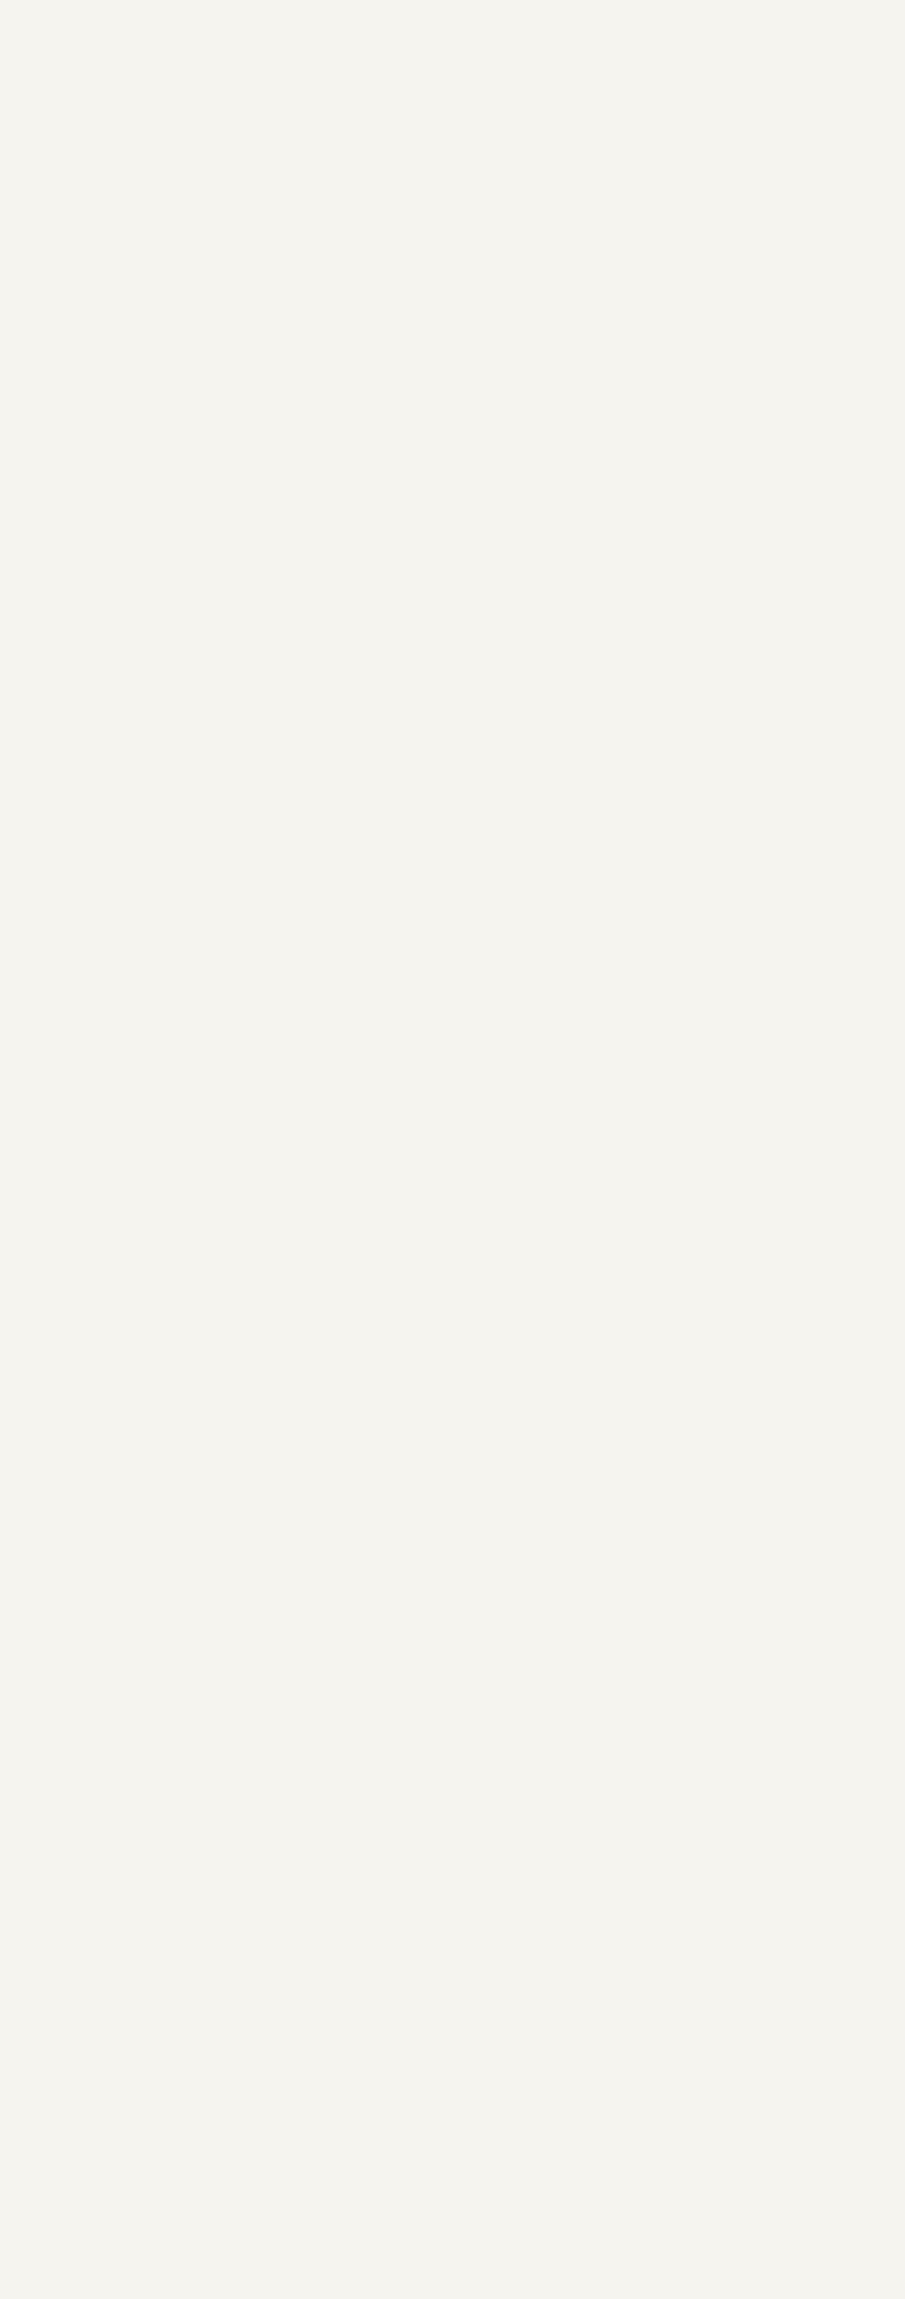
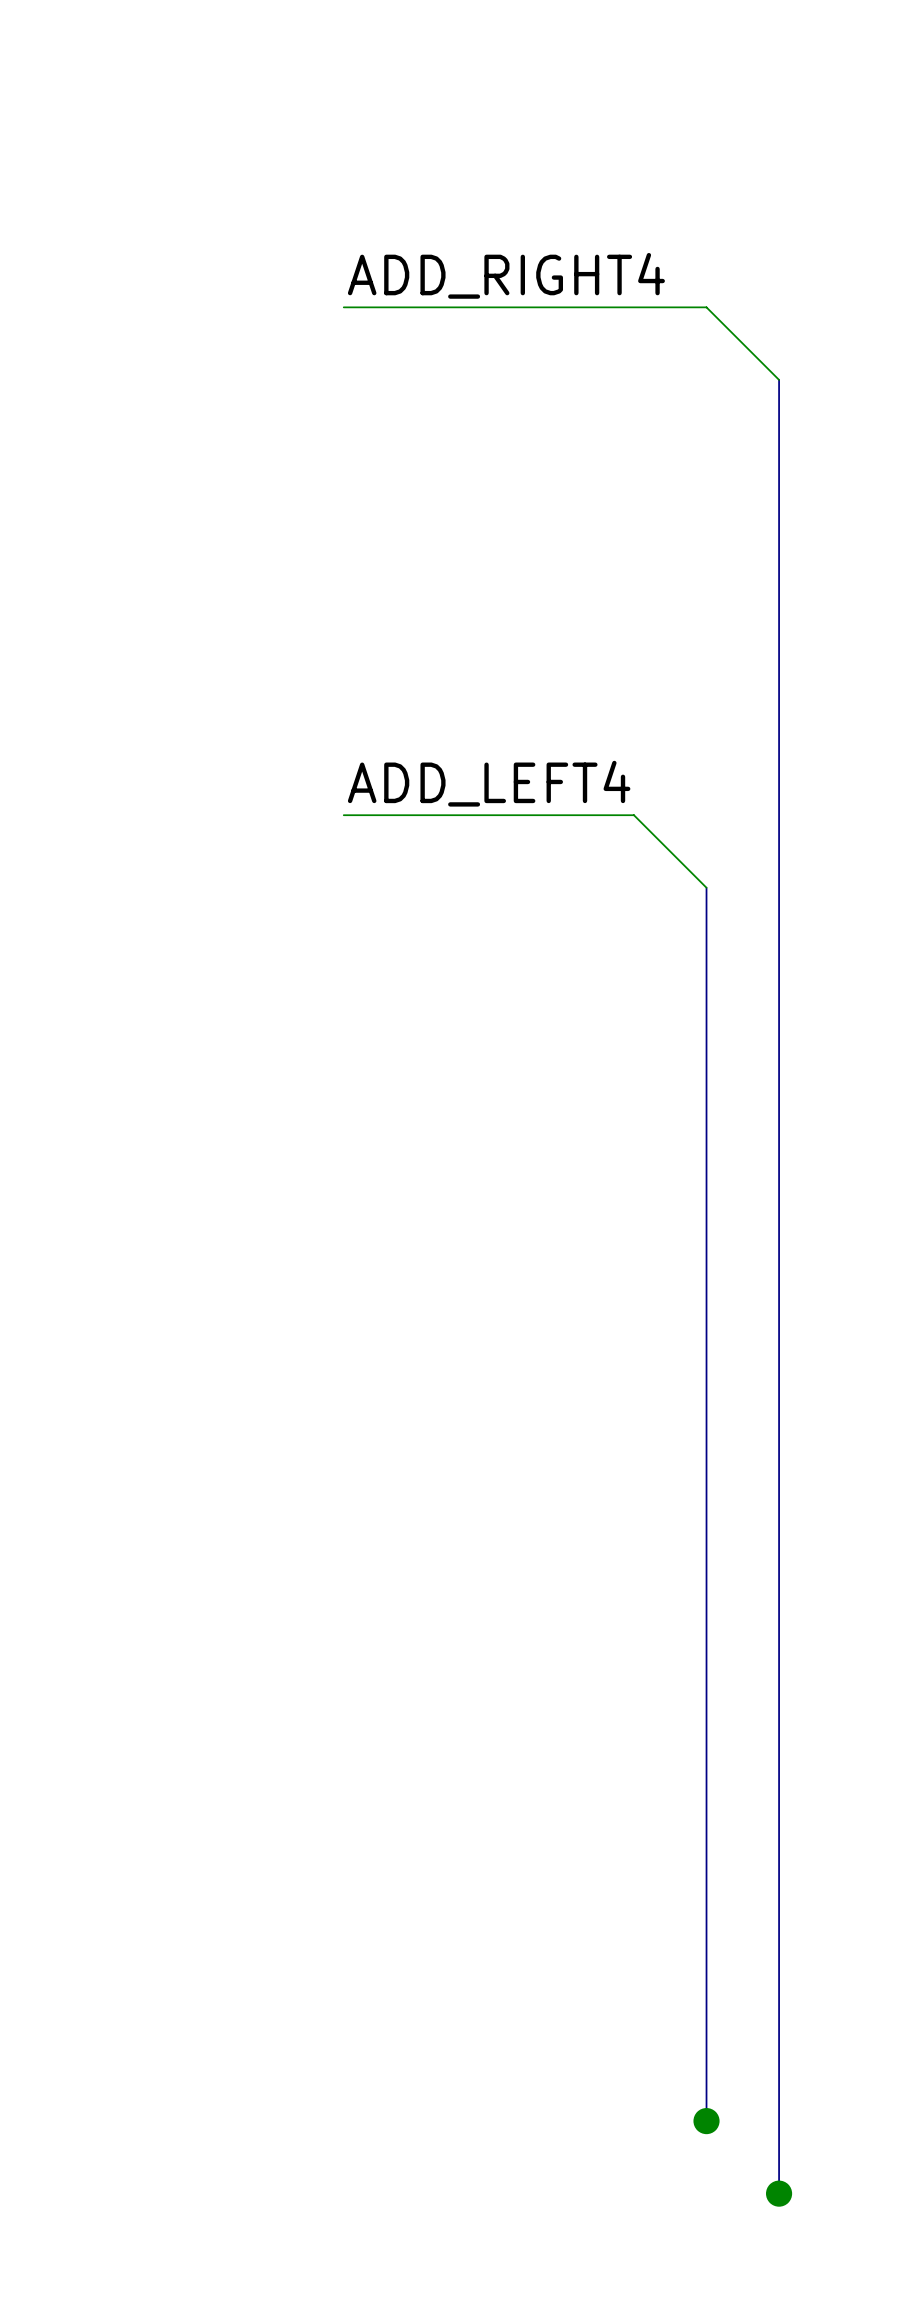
label: none -> ADD_RIGHT4 (506, 275)
wire: none -> (343, 307) (706, 307) (779, 379)
bus: none -> (779, 379) (779, 2193)
label: none -> ADD_LEFT4 (489, 783)
wire: none -> (343, 815) (633, 815) (706, 887)
bus: none -> (706, 887) (706, 2121)
junction: none -> (706, 2121)
junction: none -> (779, 2193)

